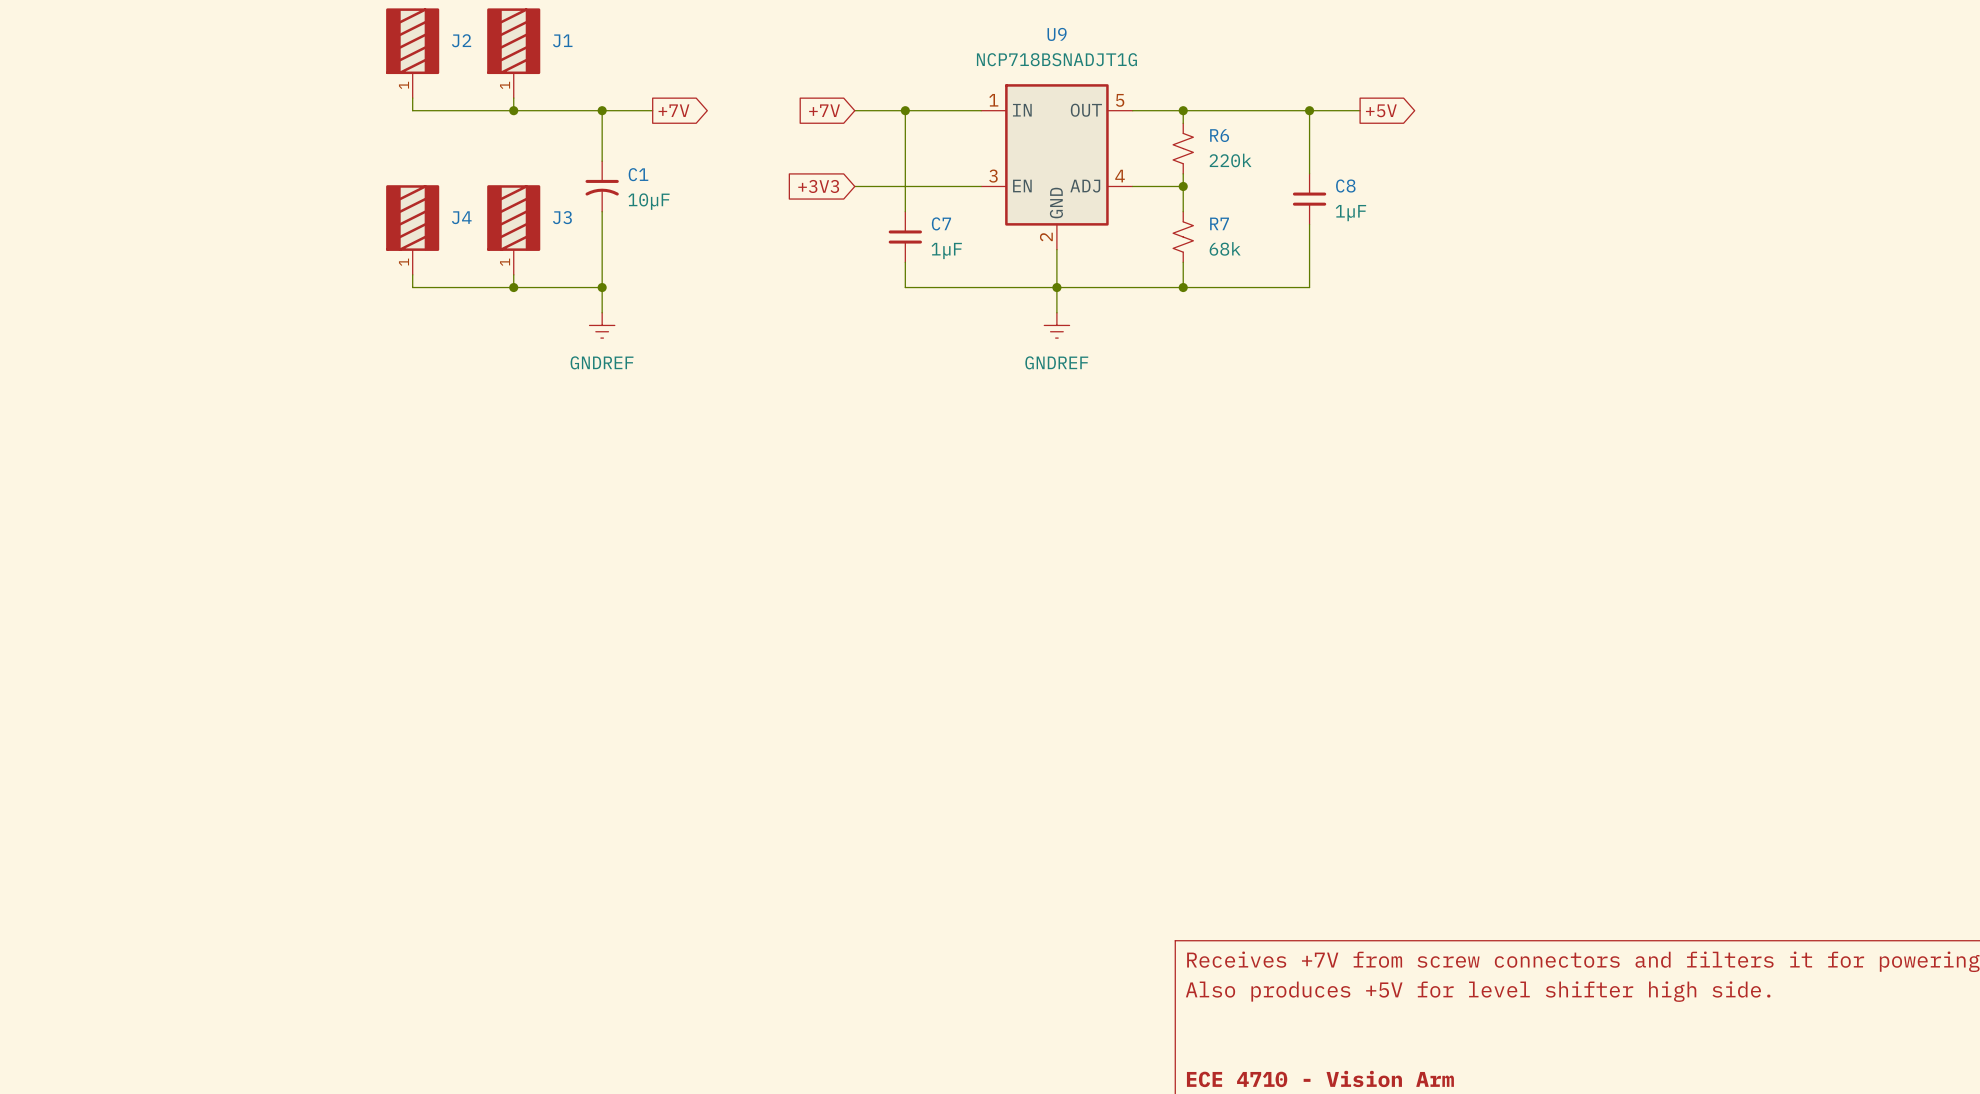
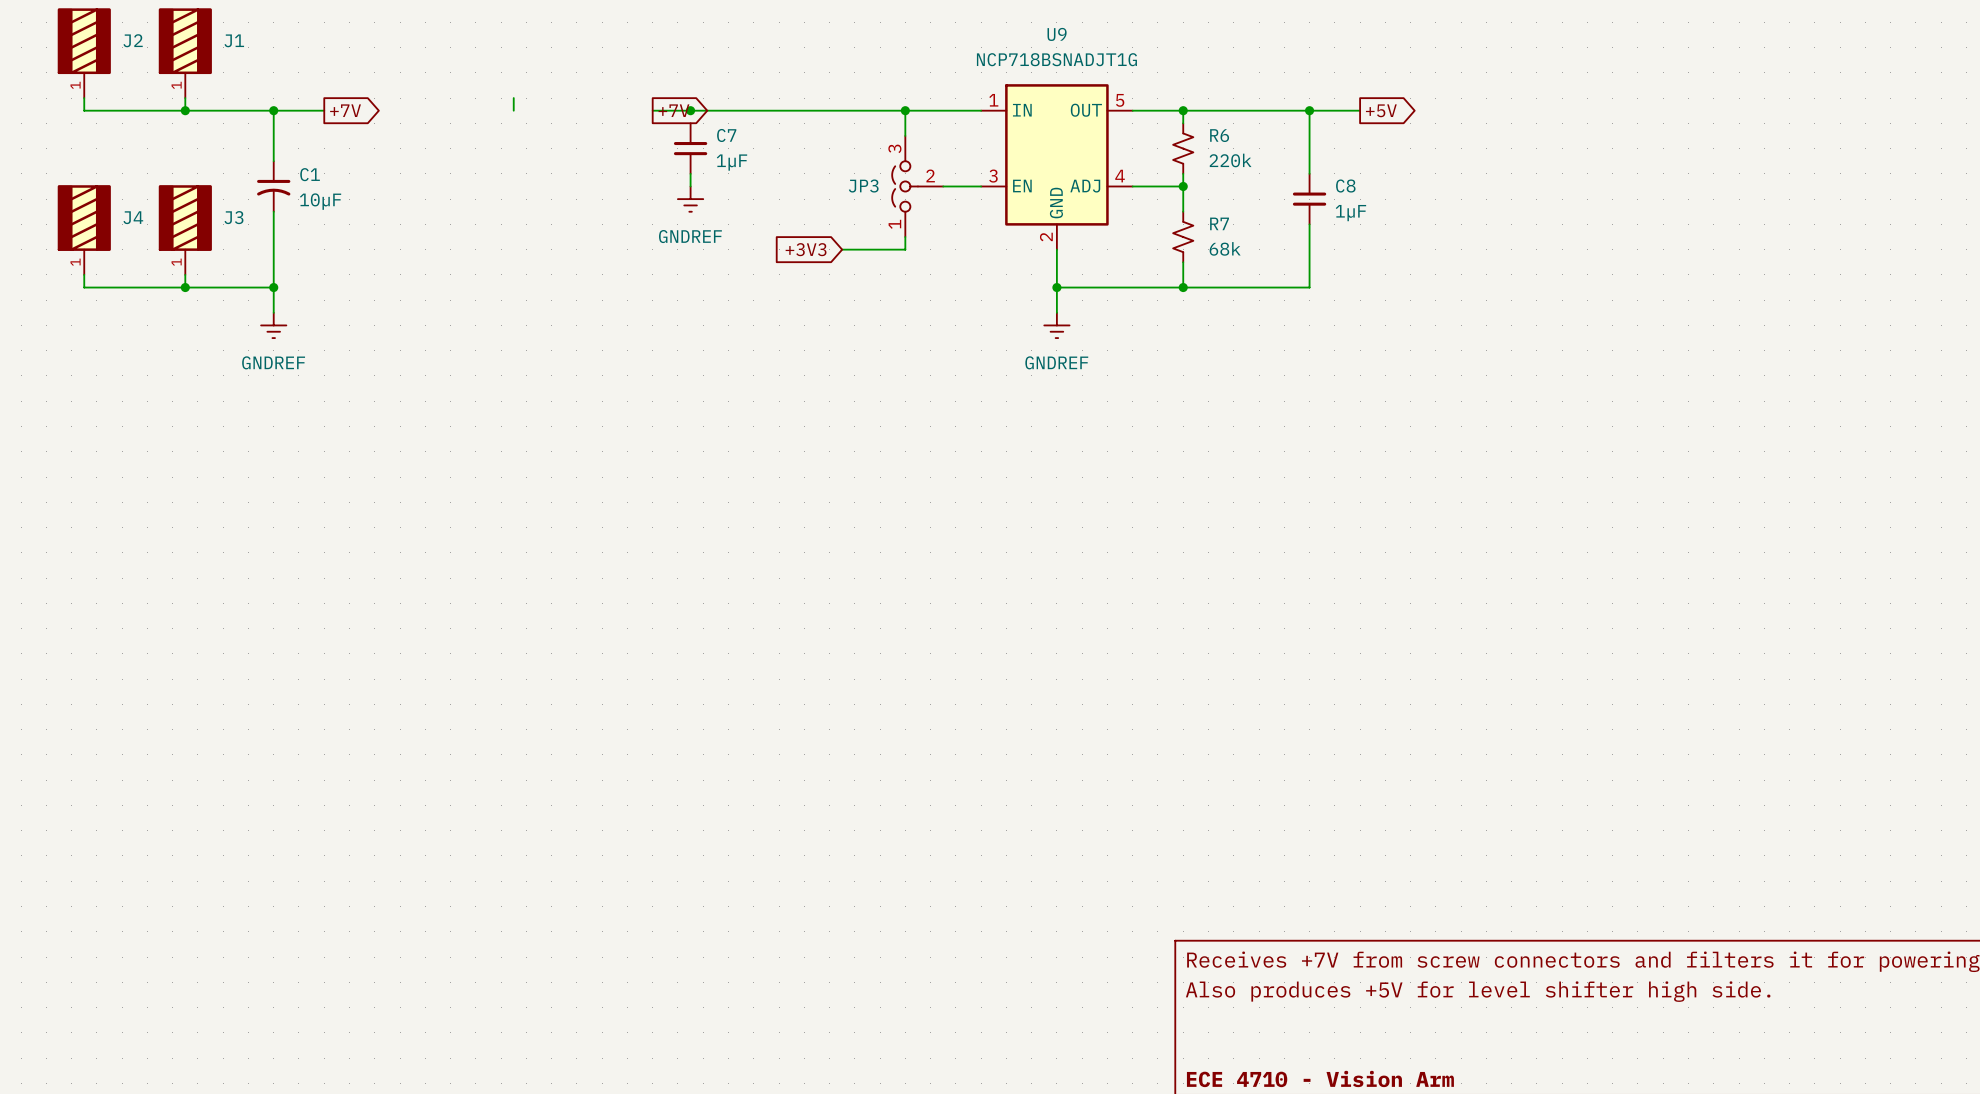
J2 position: (412, 53) -> (84, 53)
J1 position: (513, 53) -> (185, 53)
wire: none -> (84, 98) (84, 110) (324, 110)
wire: none -> (185, 98) (185, 110)
wire: (412, 98) (412, 110) (652, 110) -> (854, 110) (652, 110)
junction: none -> (185, 110)
wire: none -> (273, 110) (273, 161)
junction: none -> (273, 110)
global label: none -> +7V (345, 110)
junction: (513, 110) -> none
wire: (602, 110) (602, 161) -> none
junction: (602, 110) -> none
junction: none -> (690, 110)
global label: +7V (824, 110) -> none
wire: (905, 135) (905, 211) -> none
C1 position: (602, 186) -> (273, 186)
global label position: +3V3 (818, 186) -> +3V3 (806, 249)
wire: (854, 186) (943, 186) -> none
JP3: none -> (917, 186)
wire: none -> (273, 211) (273, 312)
wire: (602, 211) (602, 312) -> none
J4 position: (412, 230) -> (84, 230)
J3 position: (513, 230) -> (185, 230)
wire: none -> (905, 237) (905, 249) (842, 249)
C7 position: (905, 237) -> (690, 148)
wire: (905, 262) (905, 287) (1056, 287) -> none
wire: none -> (84, 274) (84, 287) (273, 287)
wire: none -> (185, 274) (185, 287)
wire: (412, 274) (412, 287) (602, 287) -> none
wire: (513, 274) (513, 287) -> (690, 173) (690, 186)
junction: none -> (185, 287)
junction: none -> (273, 287)
junction: (513, 287) -> none
junction: (602, 287) -> none
power symbol: none -> GNDREF (273, 325)
power symbol position: GNDREF (602, 325) -> GNDREF (690, 199)

